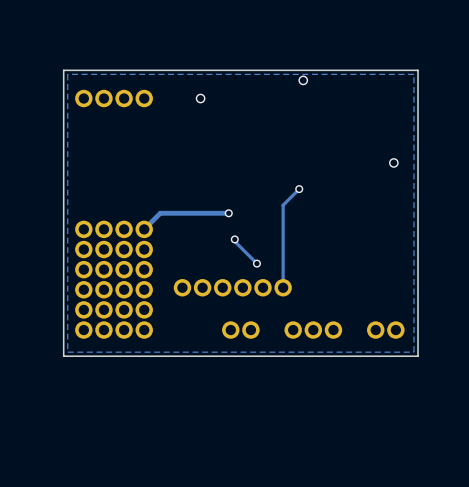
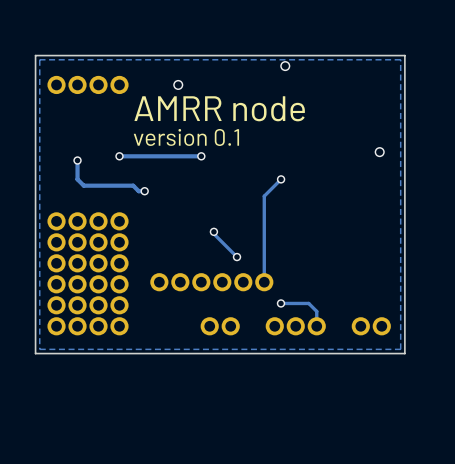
text: none -> AMRR node (219, 108)
text: none -> version 0.1 (186, 137)
via: none -> (119, 156)
track: none -> (201, 156) (119, 156)
via: none -> (201, 156)
track: none -> (77, 160) (77, 179) (83, 185) (133, 185) (138, 191) (144, 191)
via: none -> (77, 160)
via: none -> (144, 191)
track: (228, 213) (160, 213) (144, 229) -> none
via: (228, 213) -> none
track: none -> (280, 303) (308, 303) (316, 311) (316, 326)
via: none -> (280, 303)

